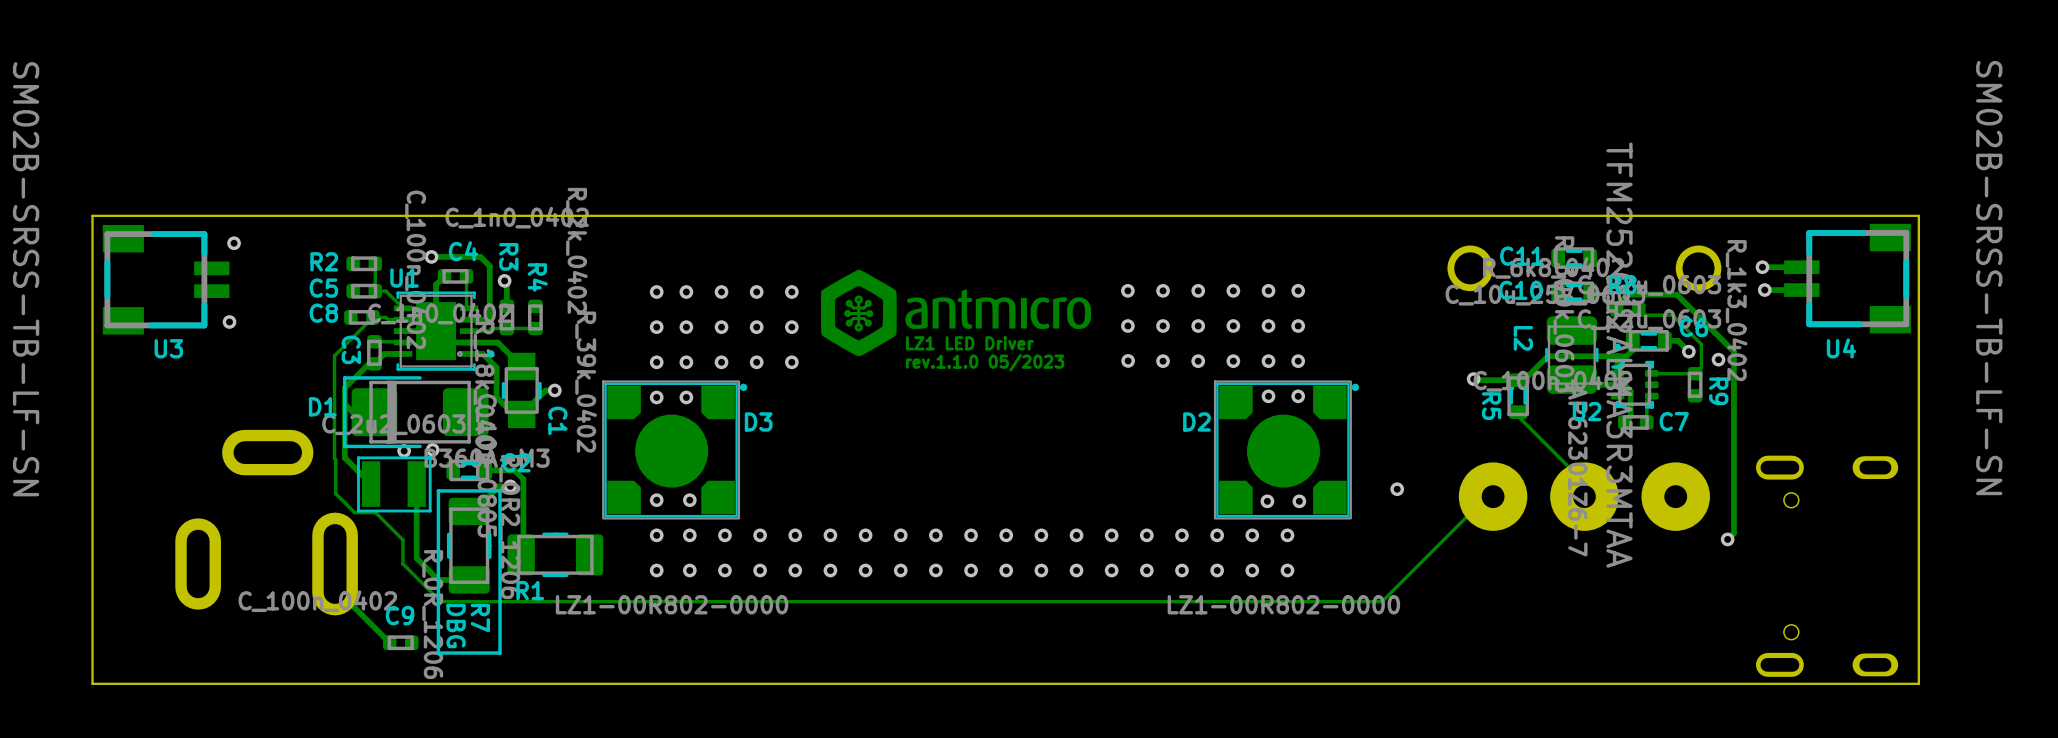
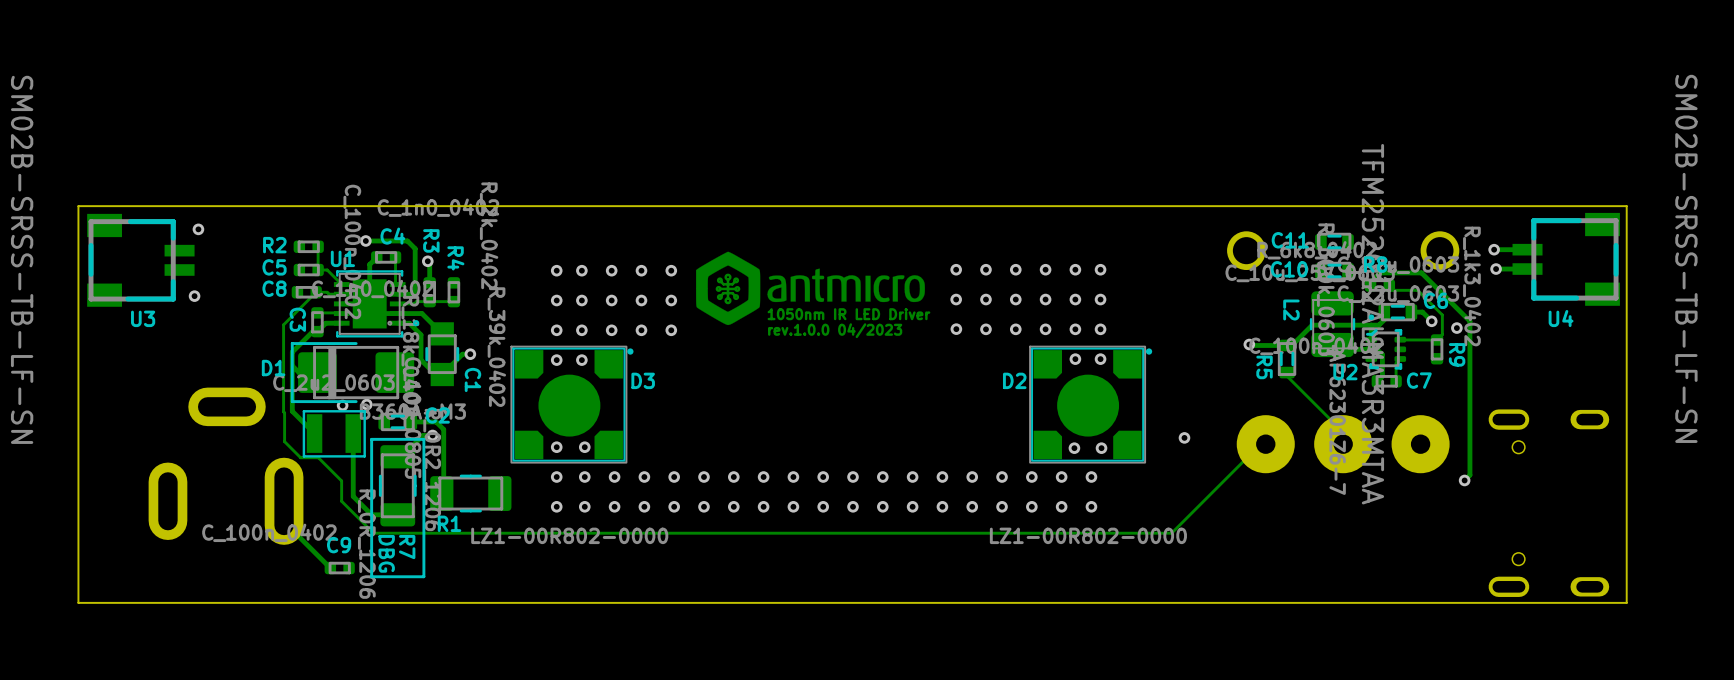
text: LZ1 LED Driver (969, 343) -> 1050nm IR LED Driver (848, 314)
text: rev.1.1.0 05/2023 (985, 362) -> rev.1.0.0 04/2023 (835, 330)

